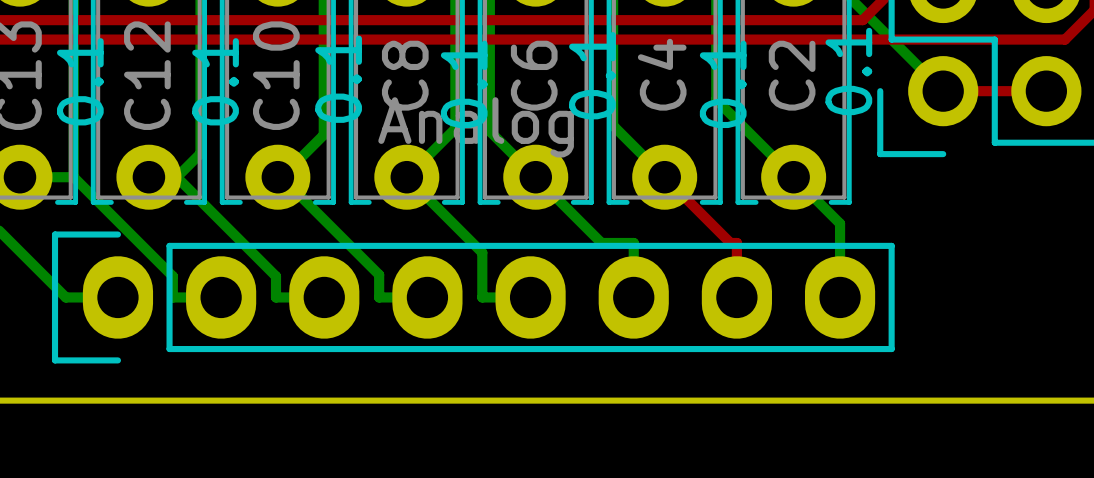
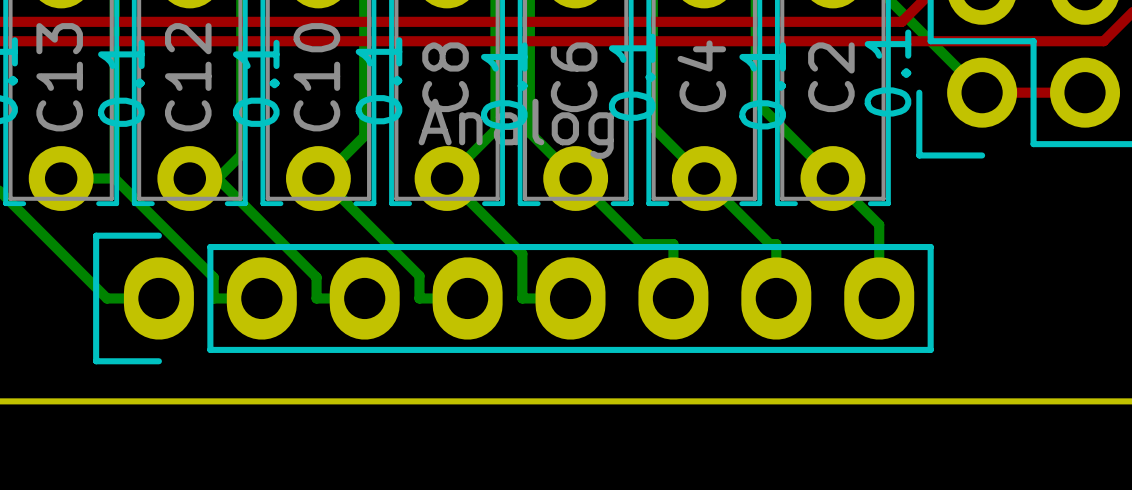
bottom track: none -> (704, 178) (769, 244) (776, 244) (776, 298)
top track: (664, 177) (730, 242) (736, 242) (736, 297) -> none

